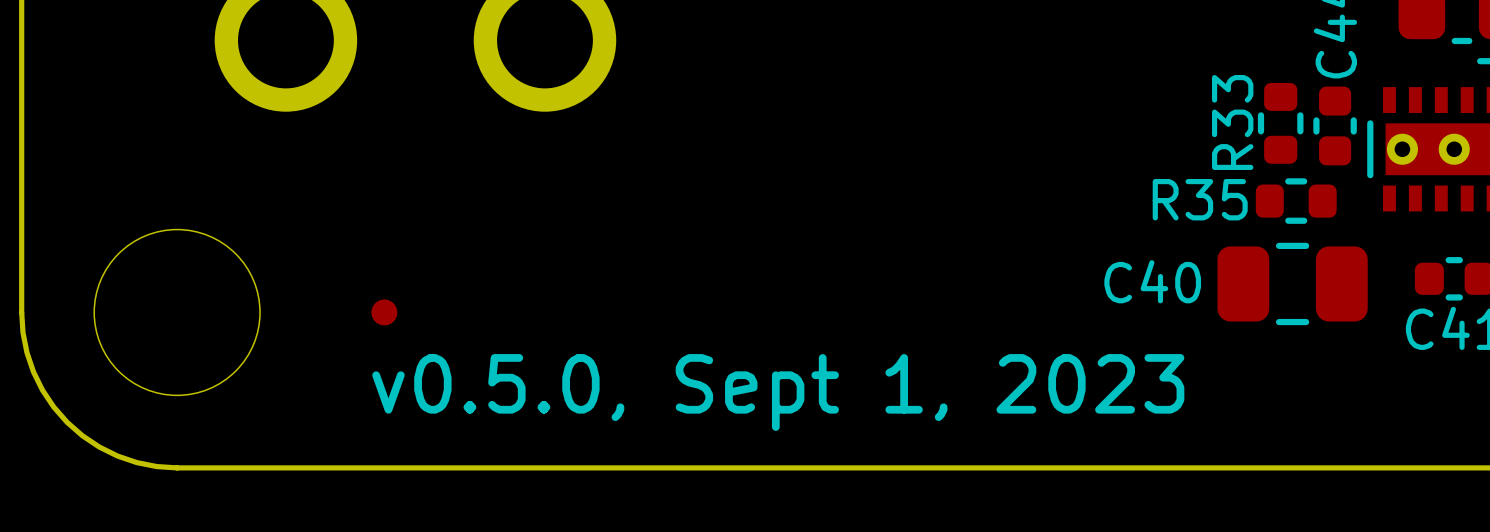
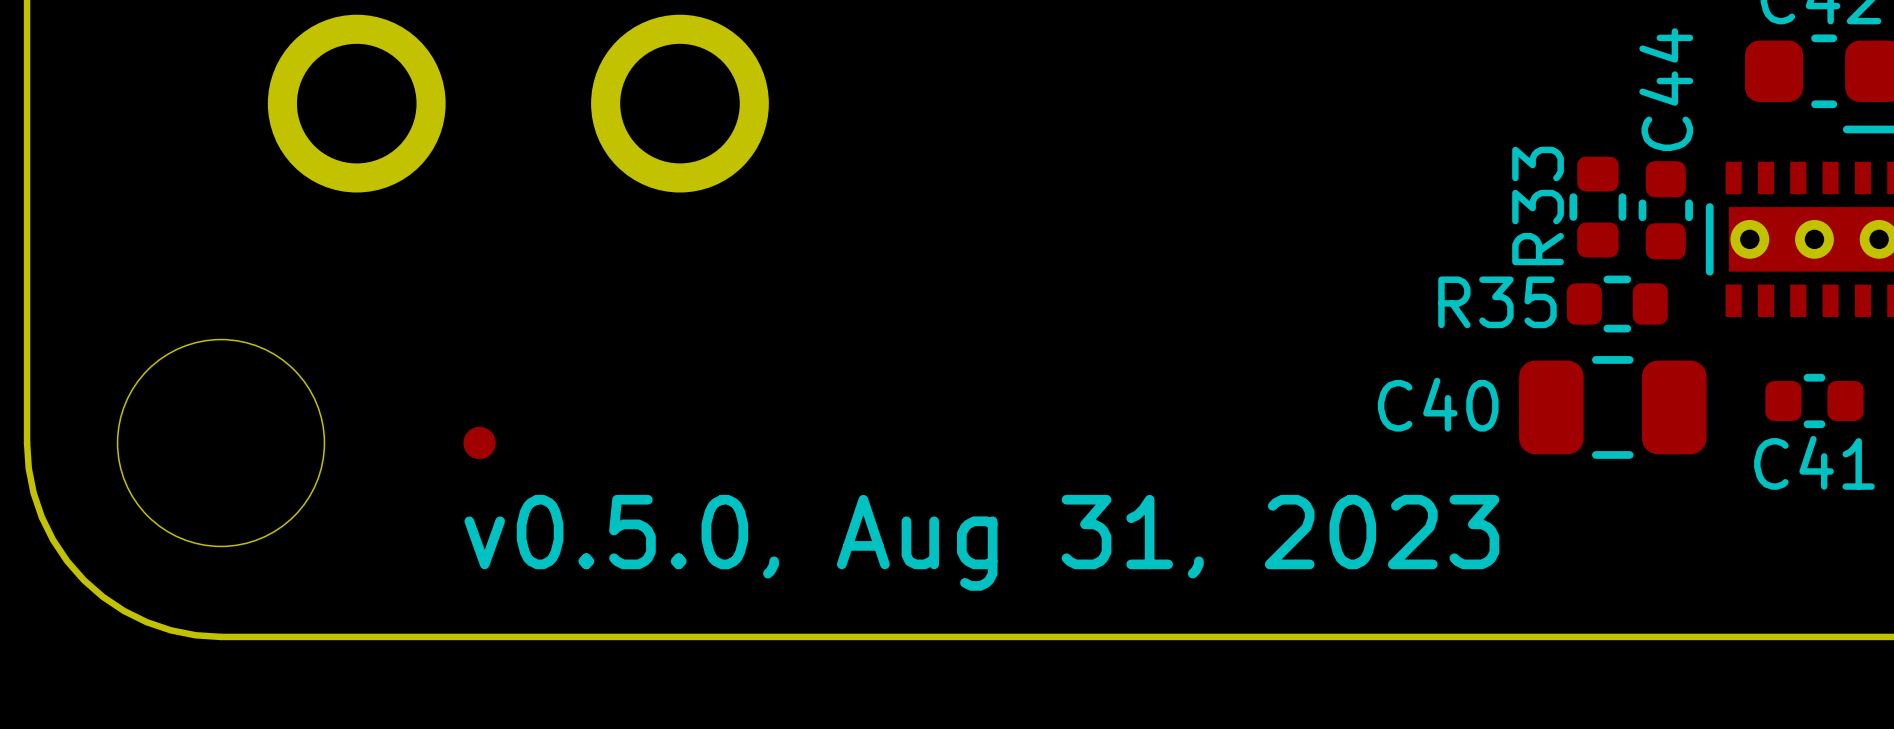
text: v0.5.0, Sept 1, 2023 (778, 392) -> v0.5.0, Aug 31, 2023 (981, 542)

